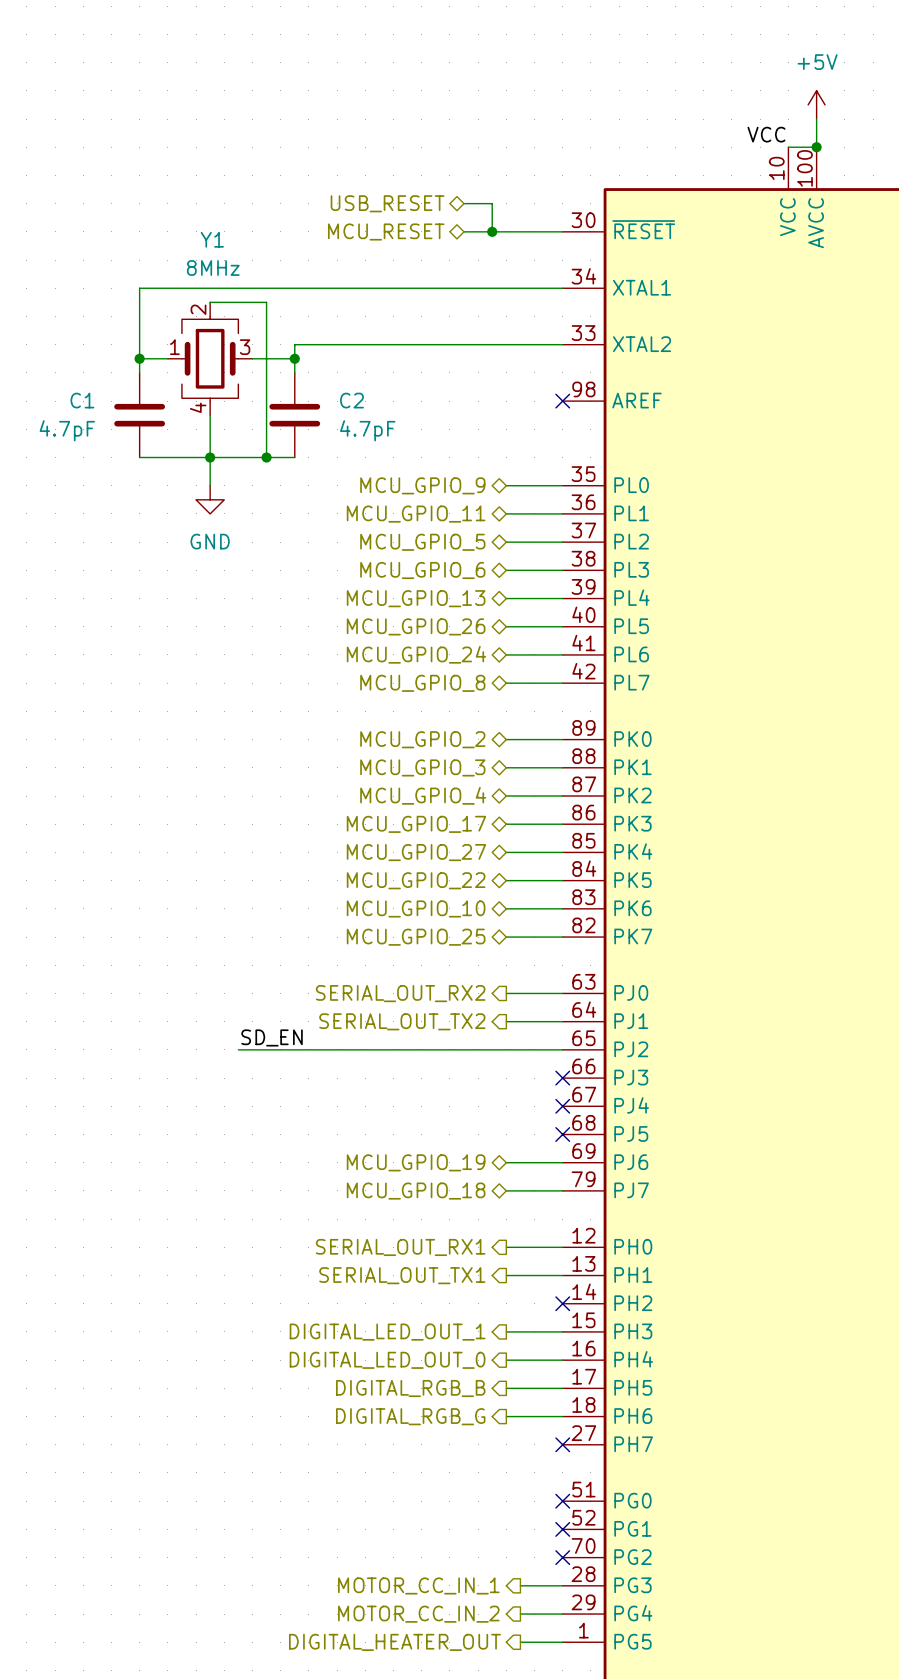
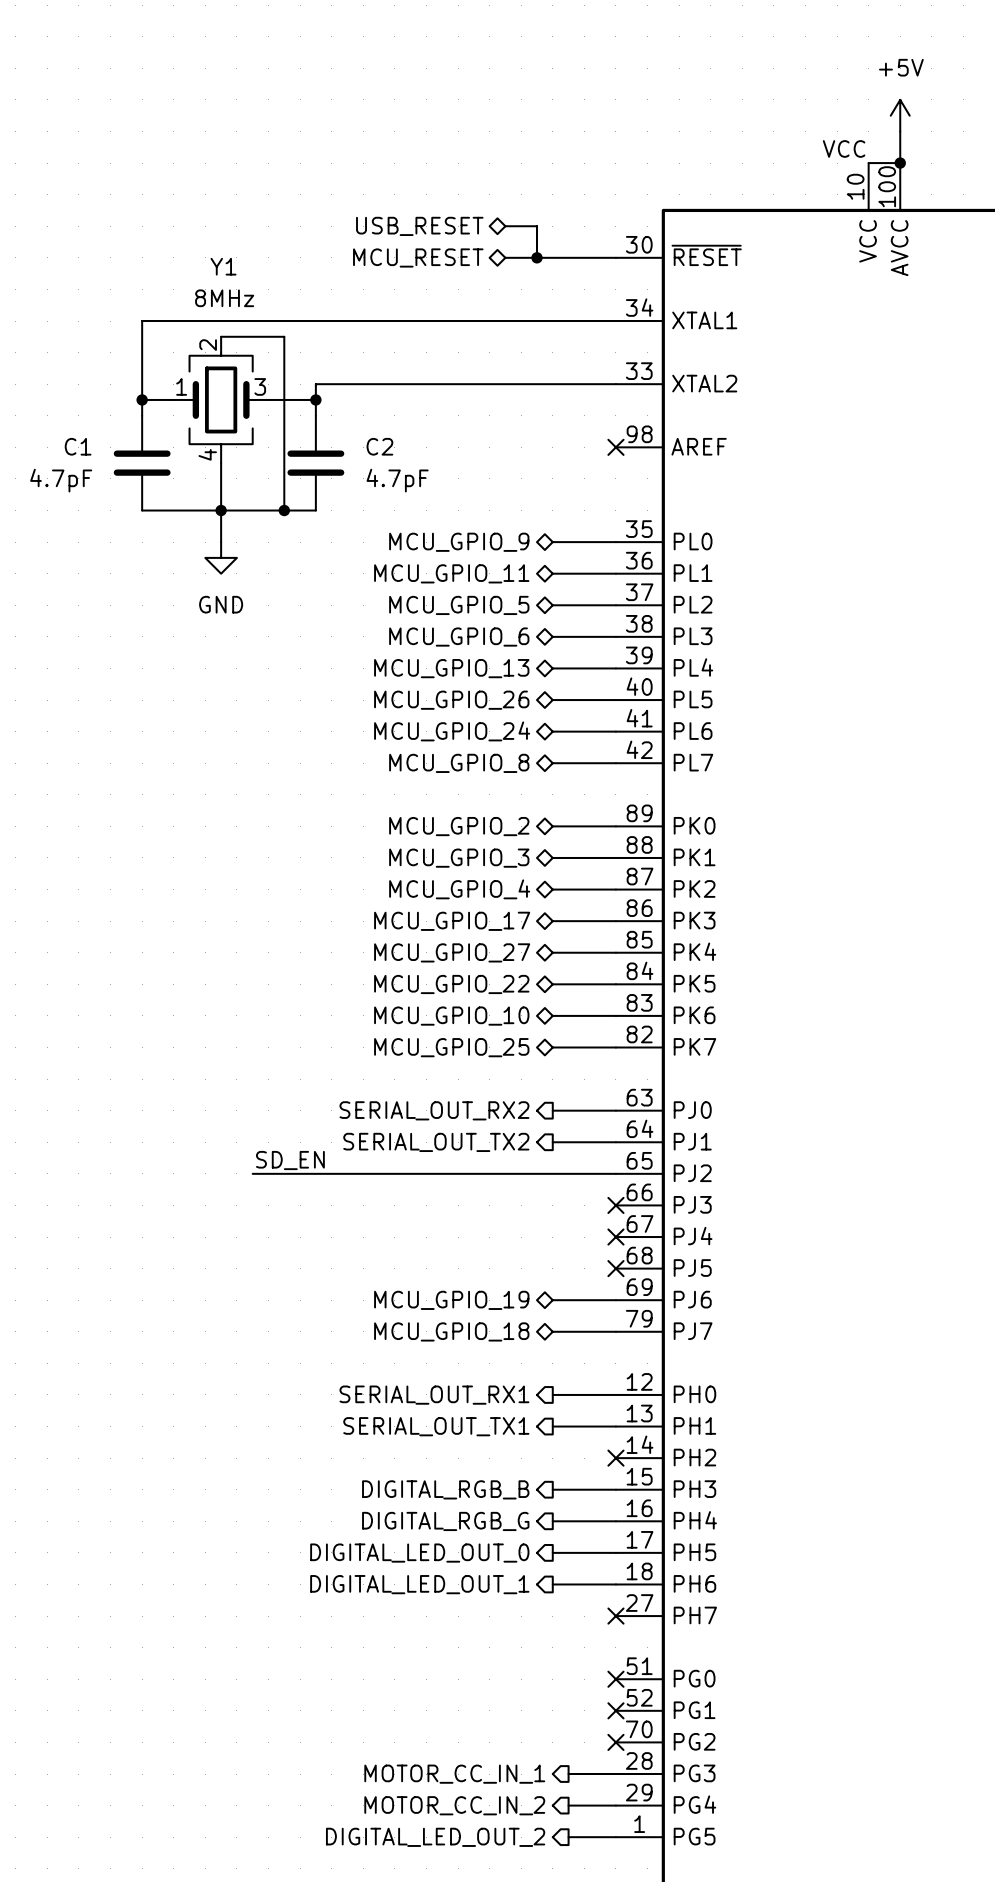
hierarchical label: DIGITAL_LED_OUT_1 (387, 1332) -> DIGITAL_RGB_B (445, 1489)
hierarchical label: DIGITAL_LED_OUT_0 (387, 1360) -> DIGITAL_RGB_G (445, 1521)
hierarchical label: DIGITAL_RGB_B (410, 1388) -> DIGITAL_LED_OUT_0 (419, 1553)
hierarchical label: DIGITAL_RGB_G (410, 1416) -> DIGITAL_LED_OUT_1 (419, 1584)
hierarchical label: DIGITAL_HEATER_OUT (394, 1642) -> DIGITAL_LED_OUT_2 (435, 1837)

